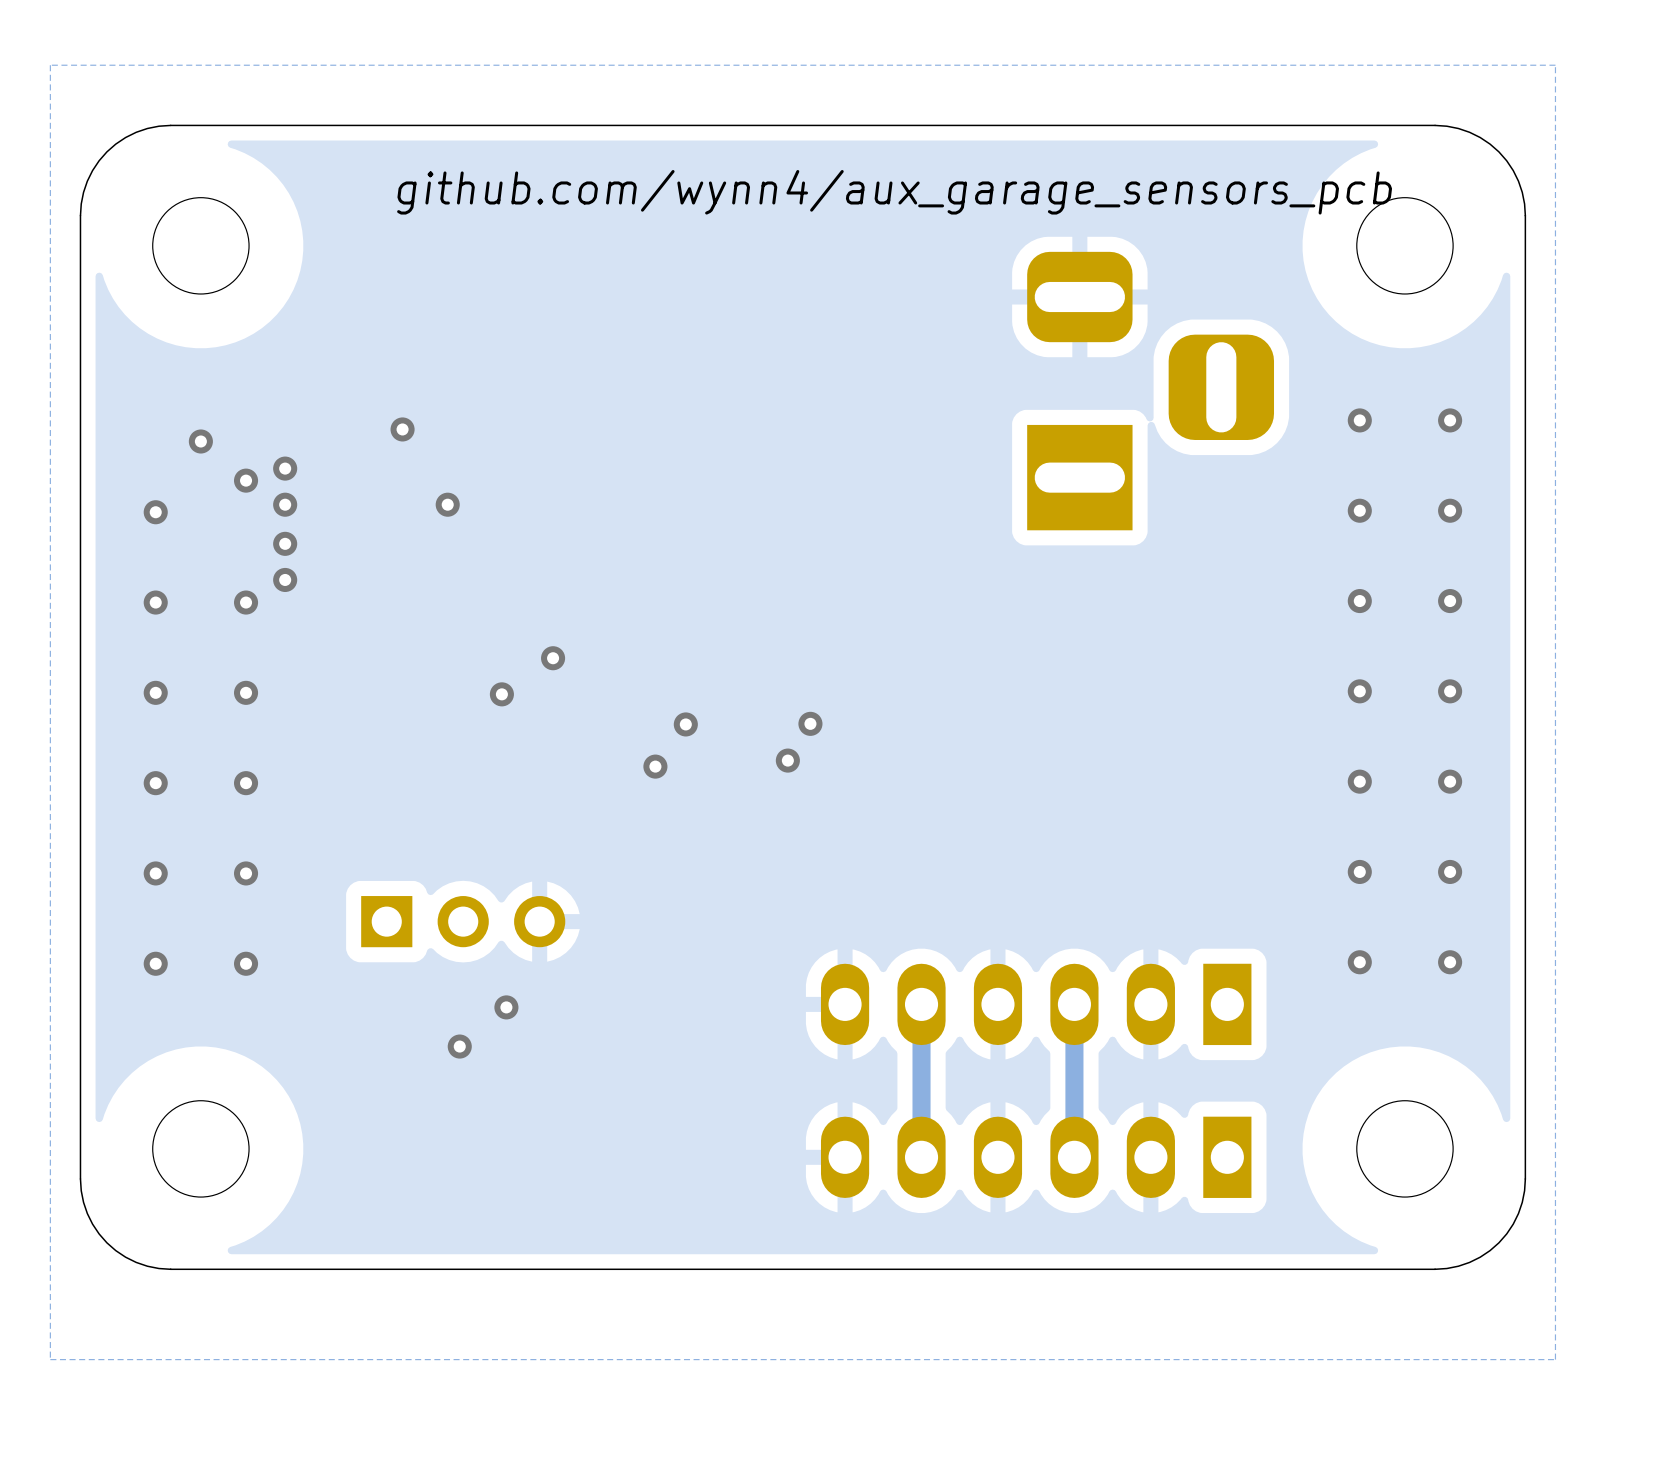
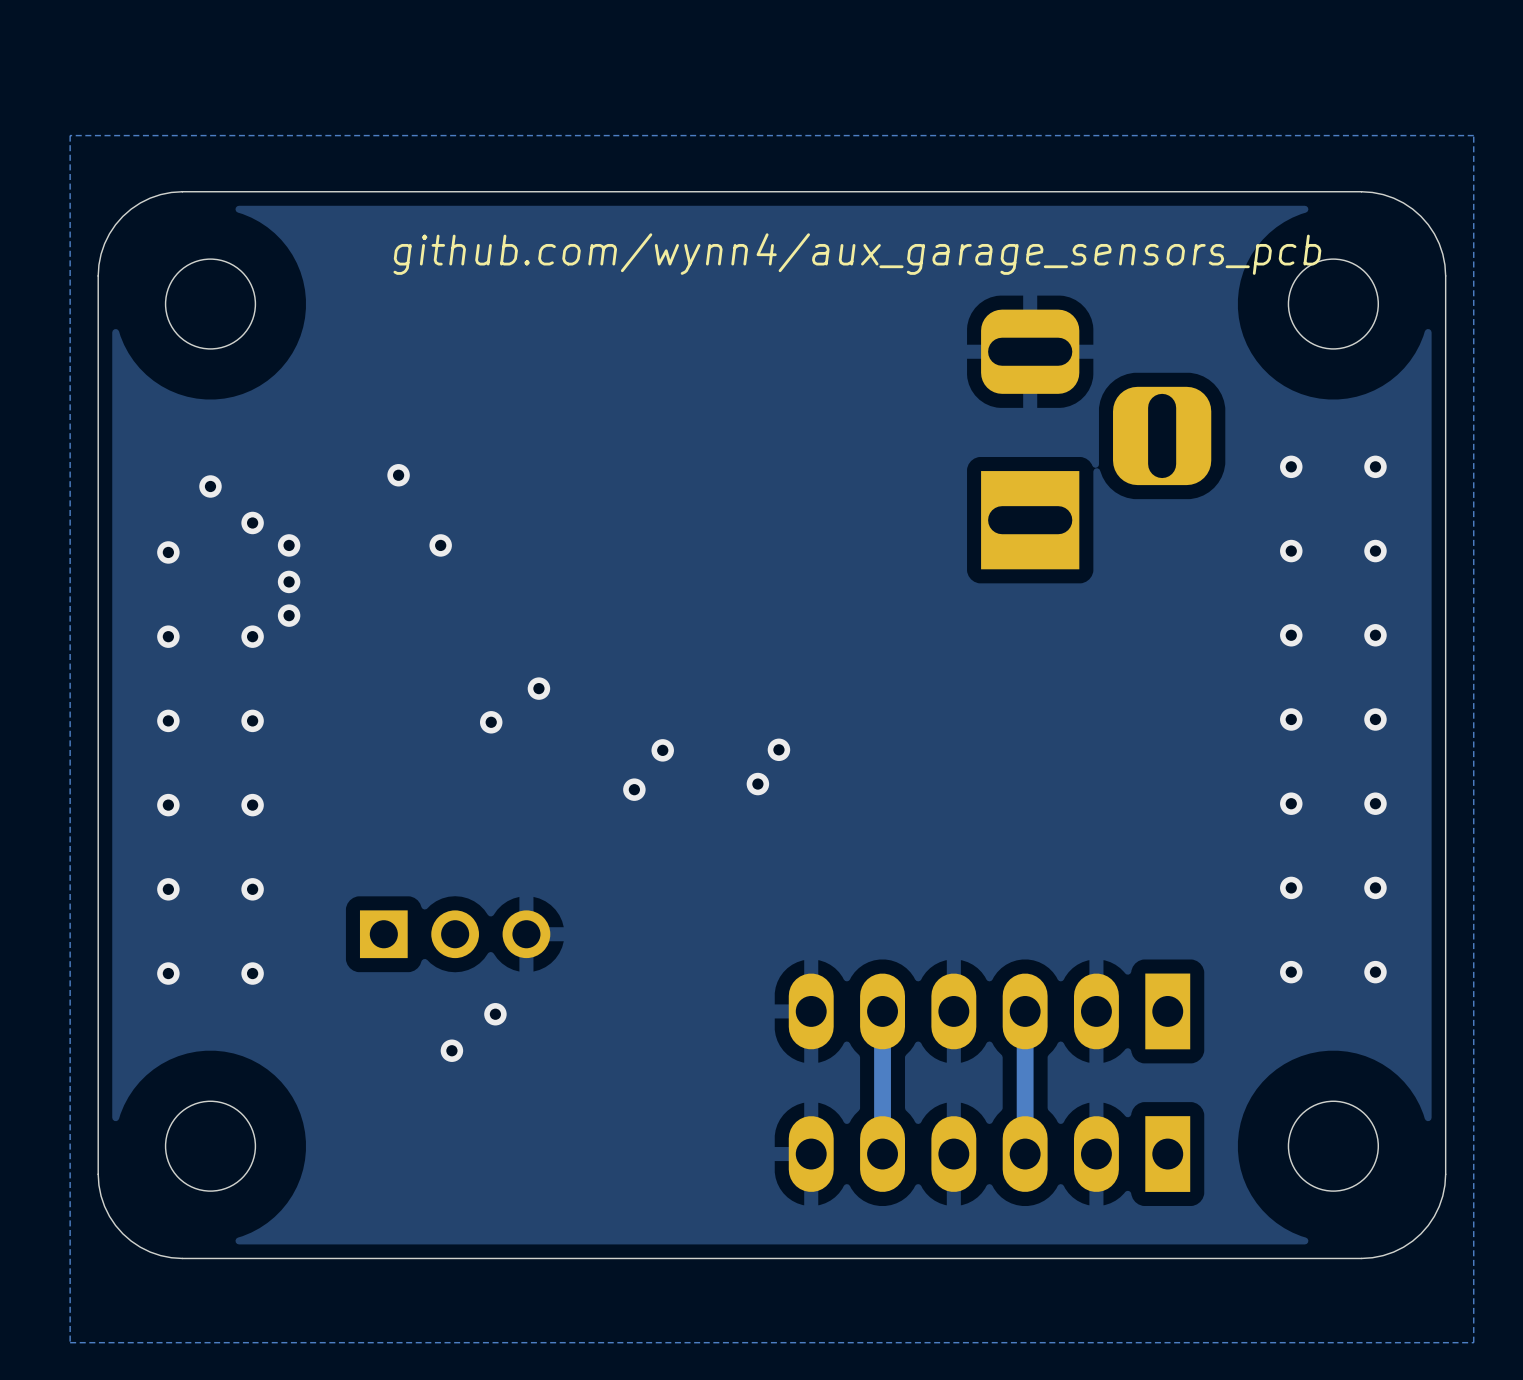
via: (285, 468) -> none

